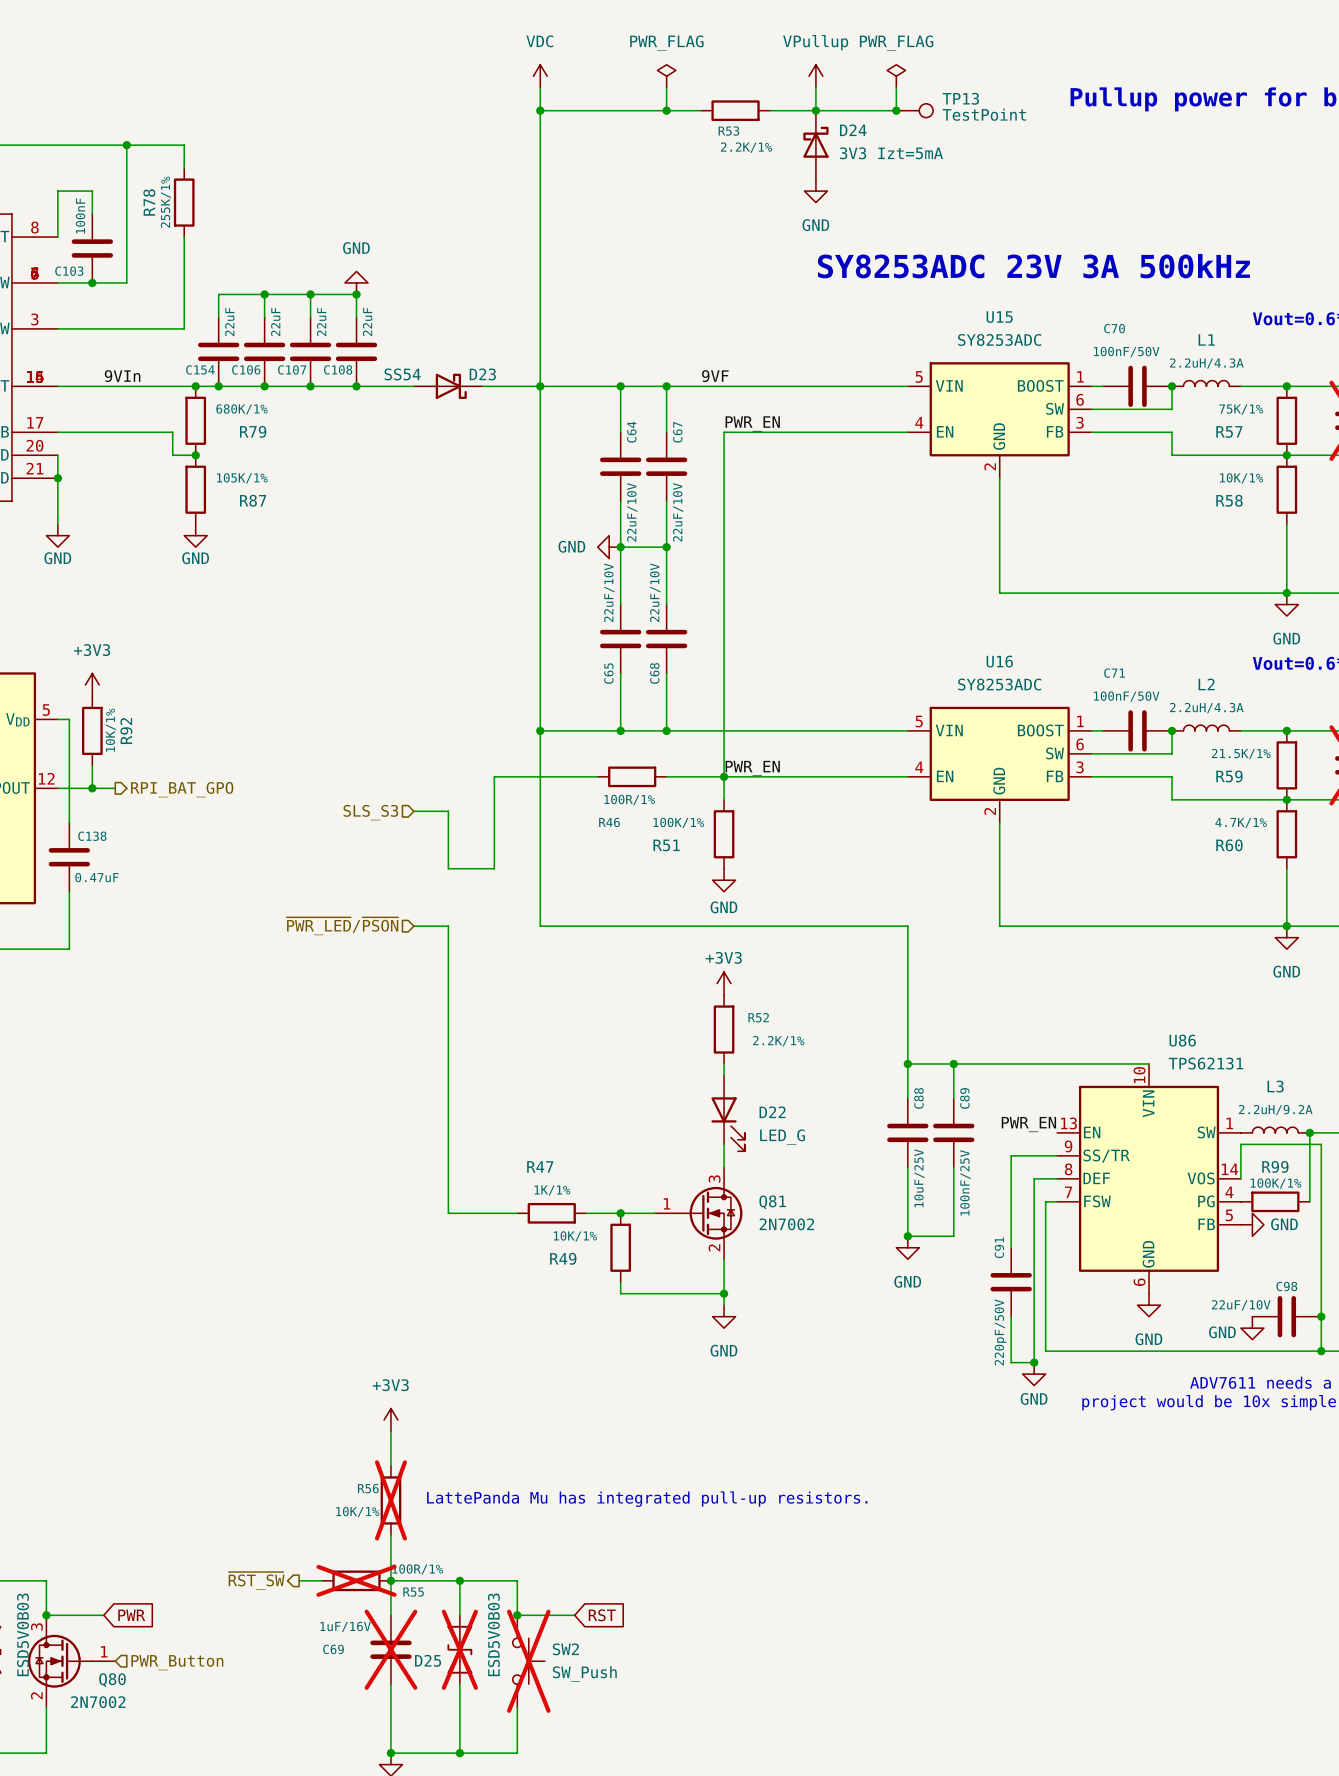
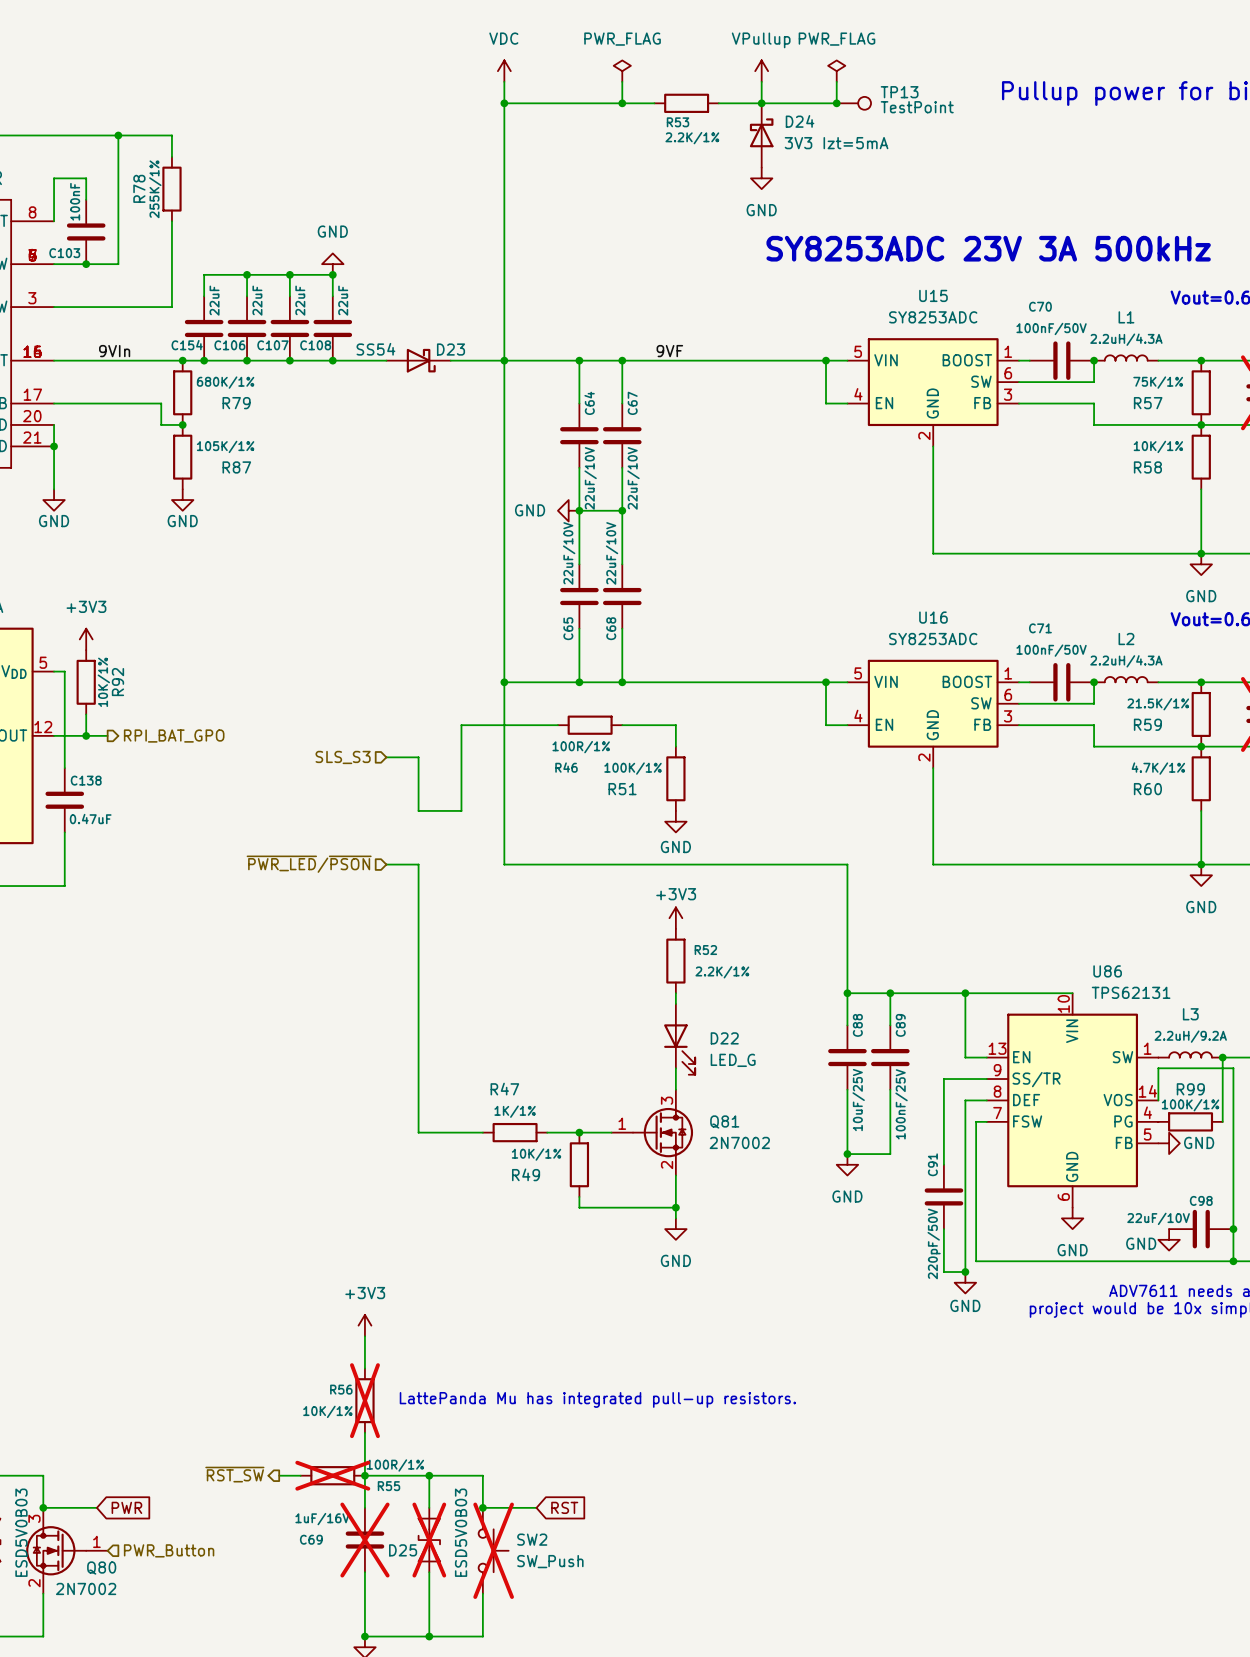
wire: none -> (826, 360) (826, 403)
junction: none -> (826, 360)
label: PWR_EN (752, 423) -> none
wire: (884, 432) (724, 432) (724, 776) (884, 776) -> (826, 682) (826, 725)
junction: none -> (826, 682)
label: PWR_EN (752, 768) -> none
junction: (724, 776) -> none
wire: none -> (965, 993) (965, 1057) (986, 1057)
junction: none -> (965, 993)
label: PWR_EN (1028, 1124) -> none

